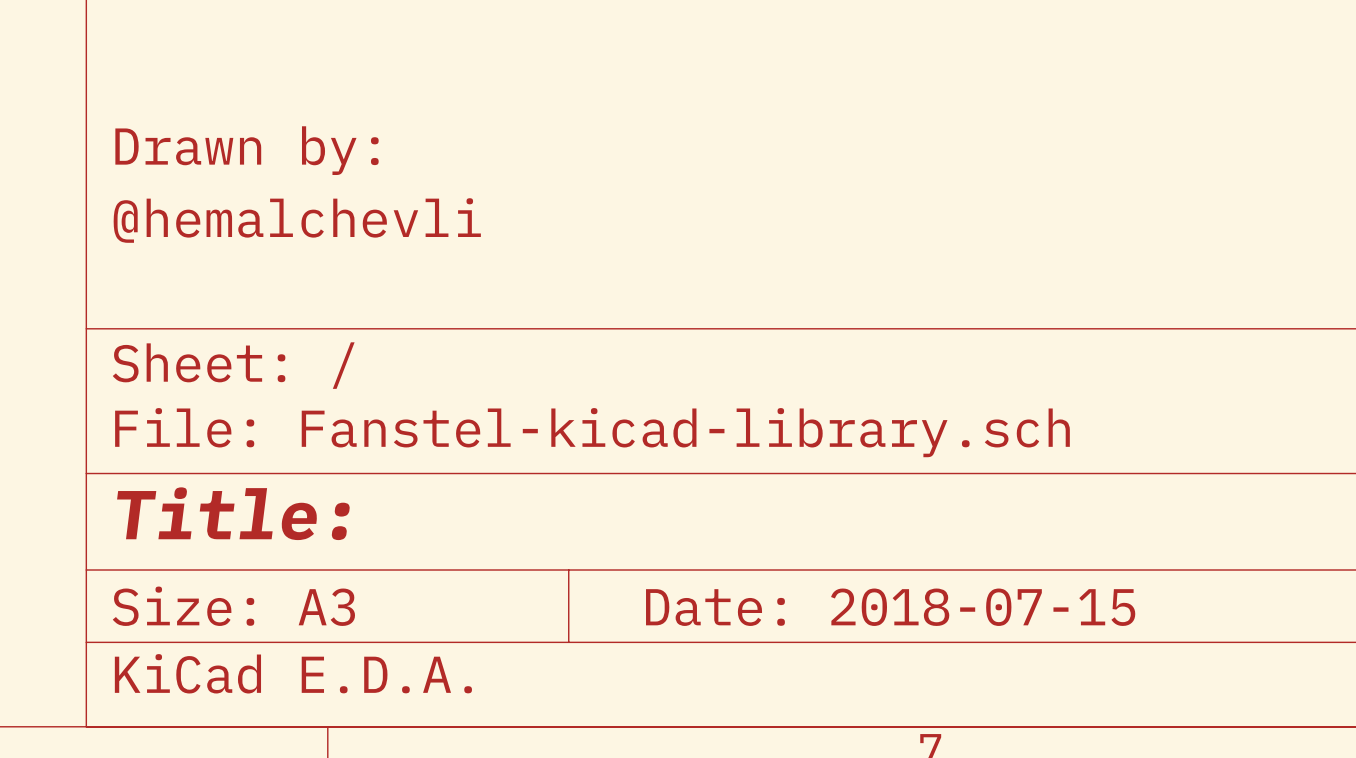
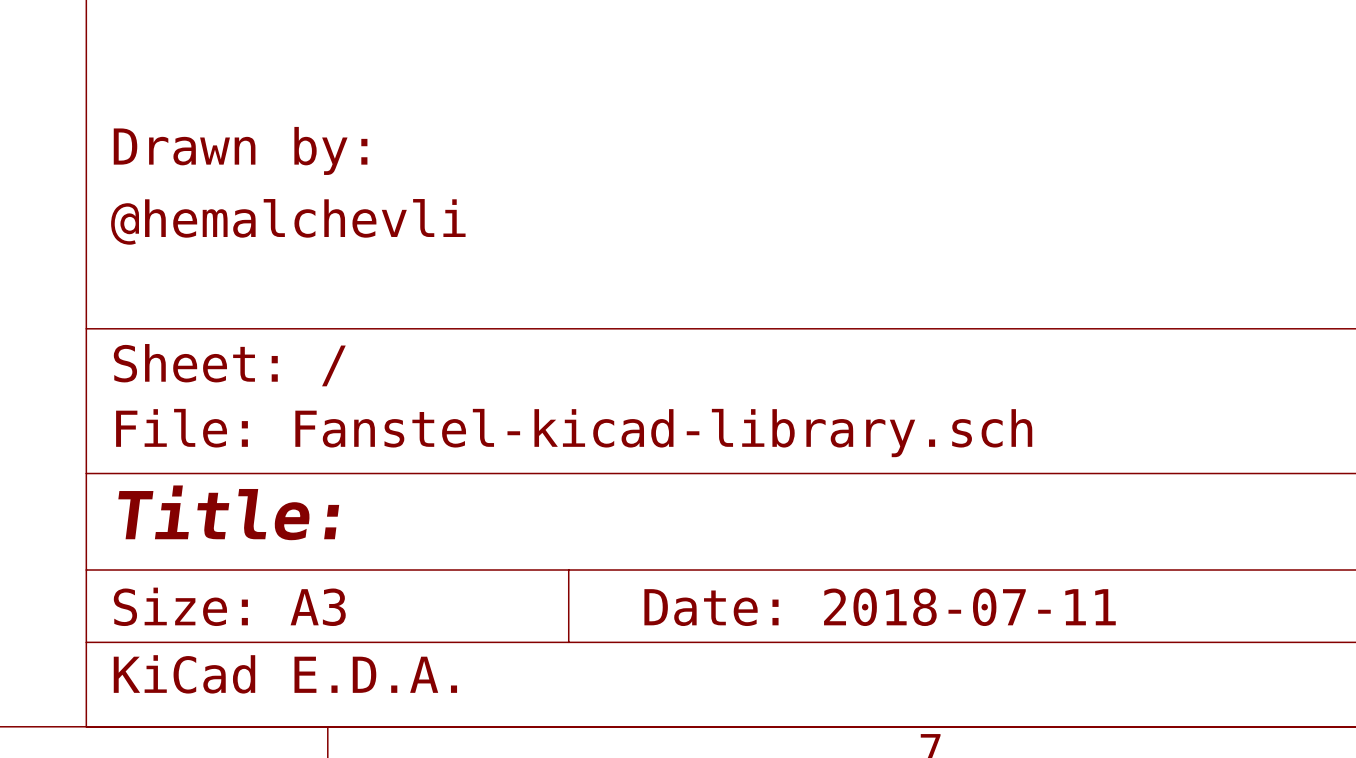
title block: Date: 2018-07-15 (890, 607) -> Date: 2018-07-11 (880, 607)

